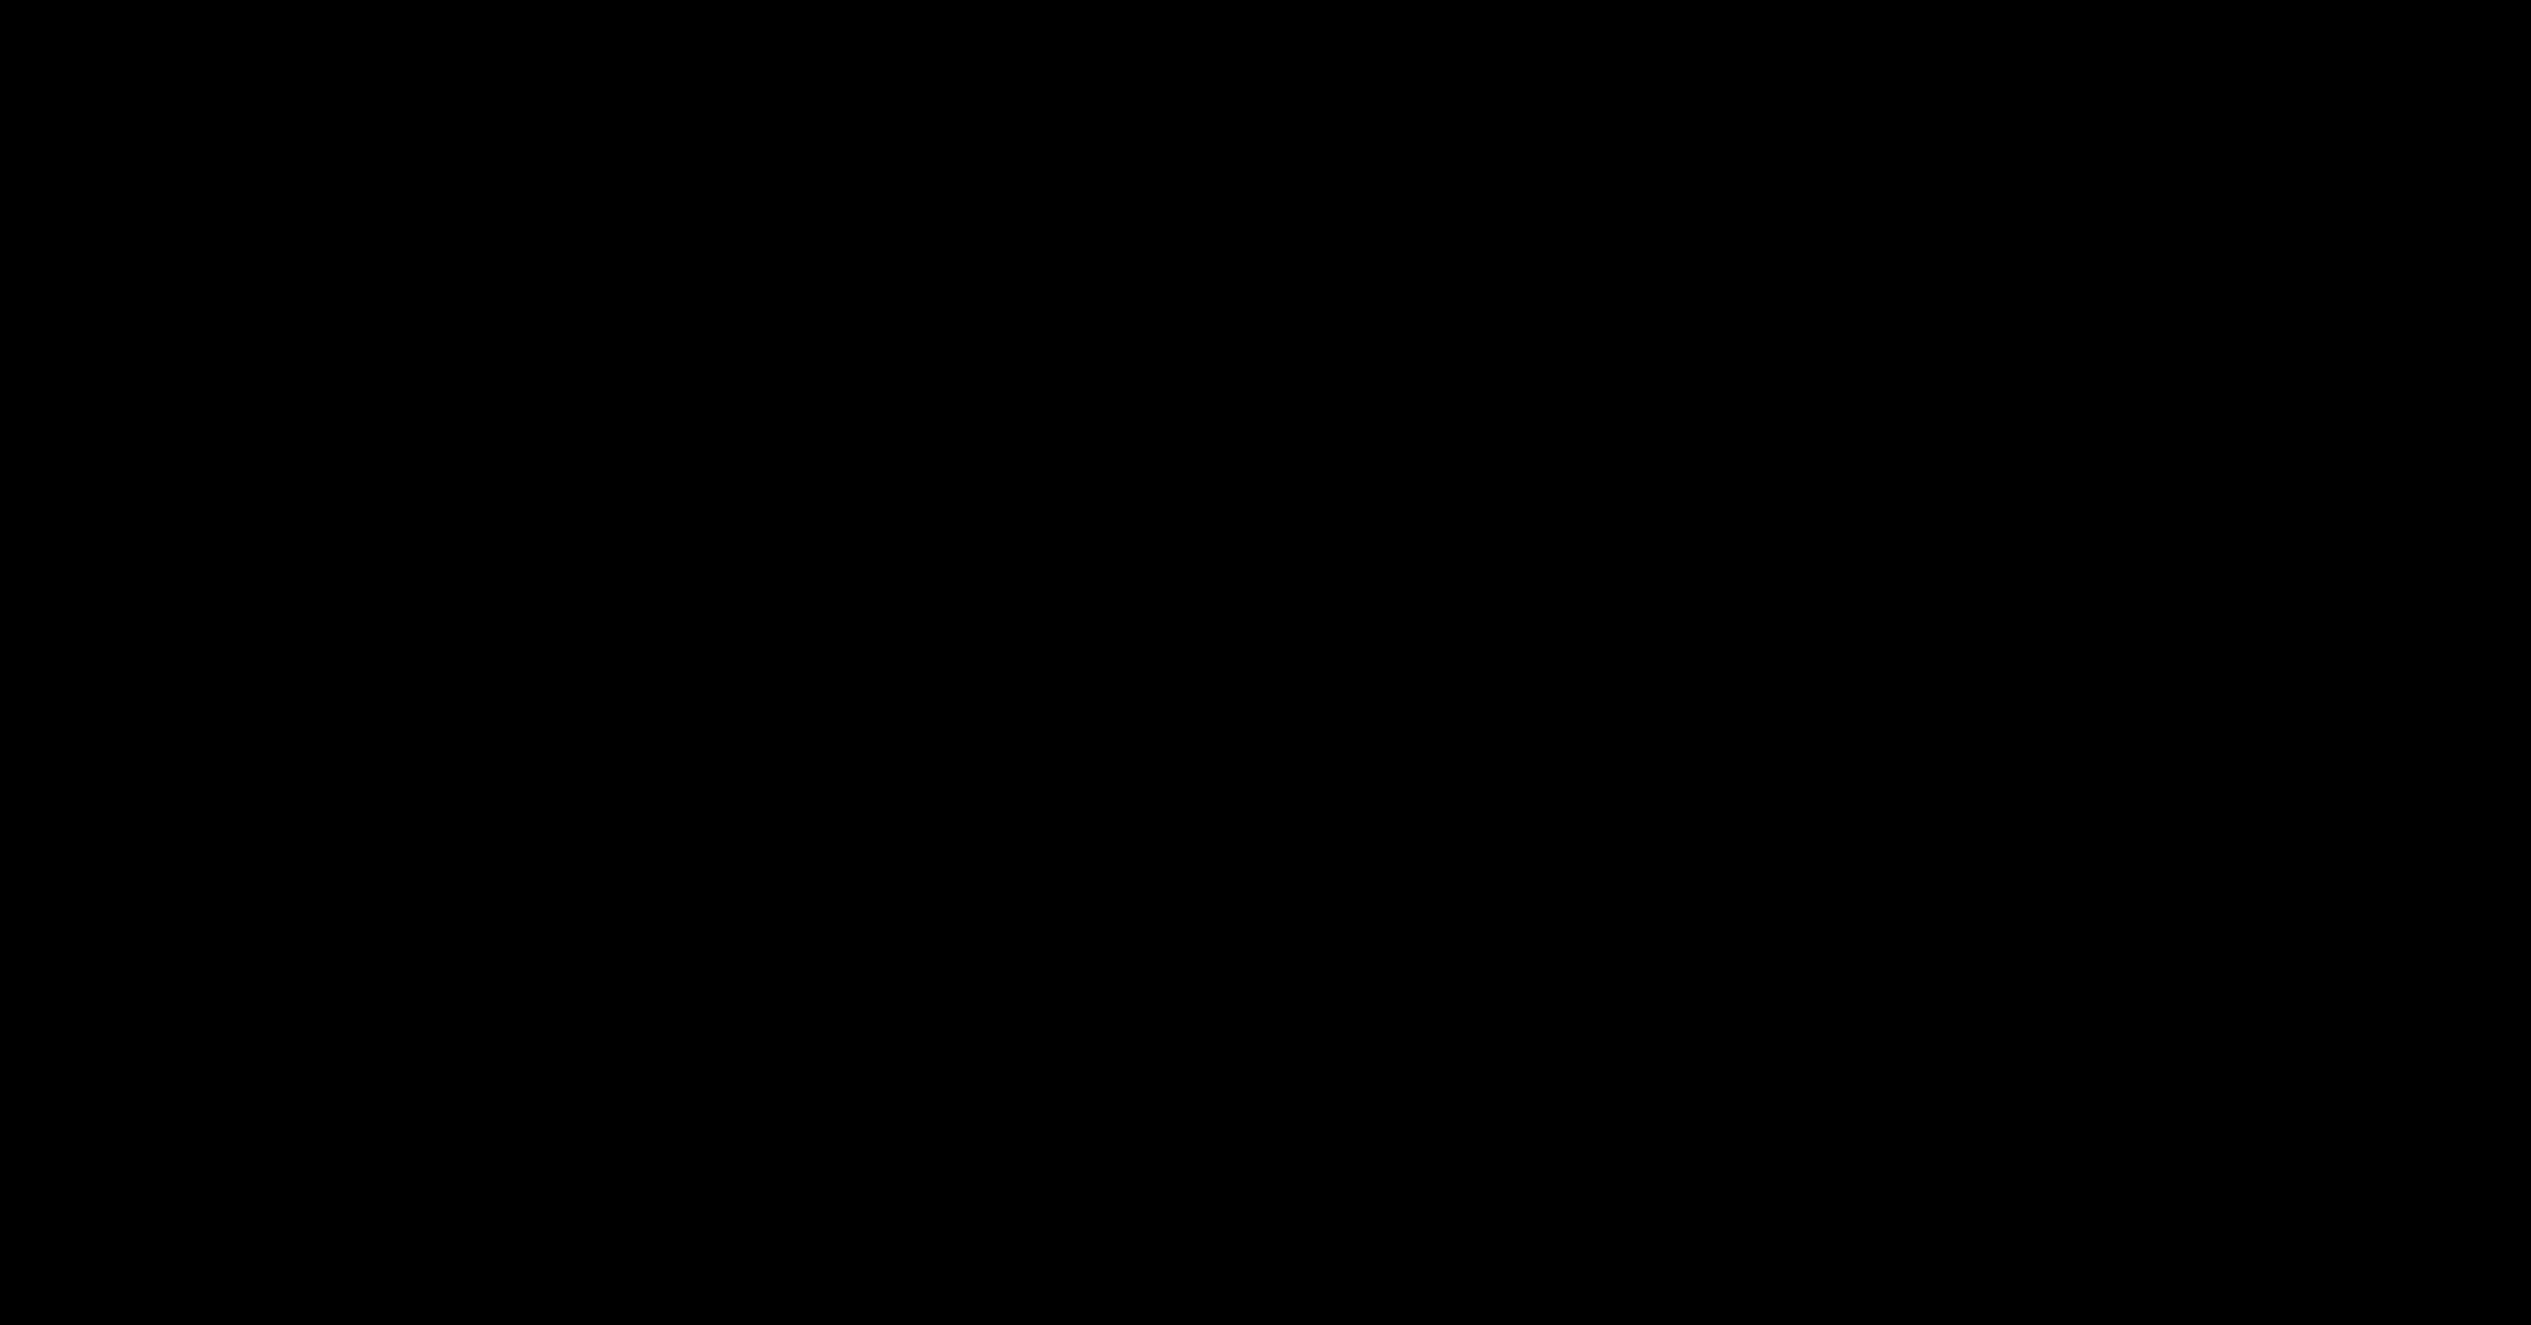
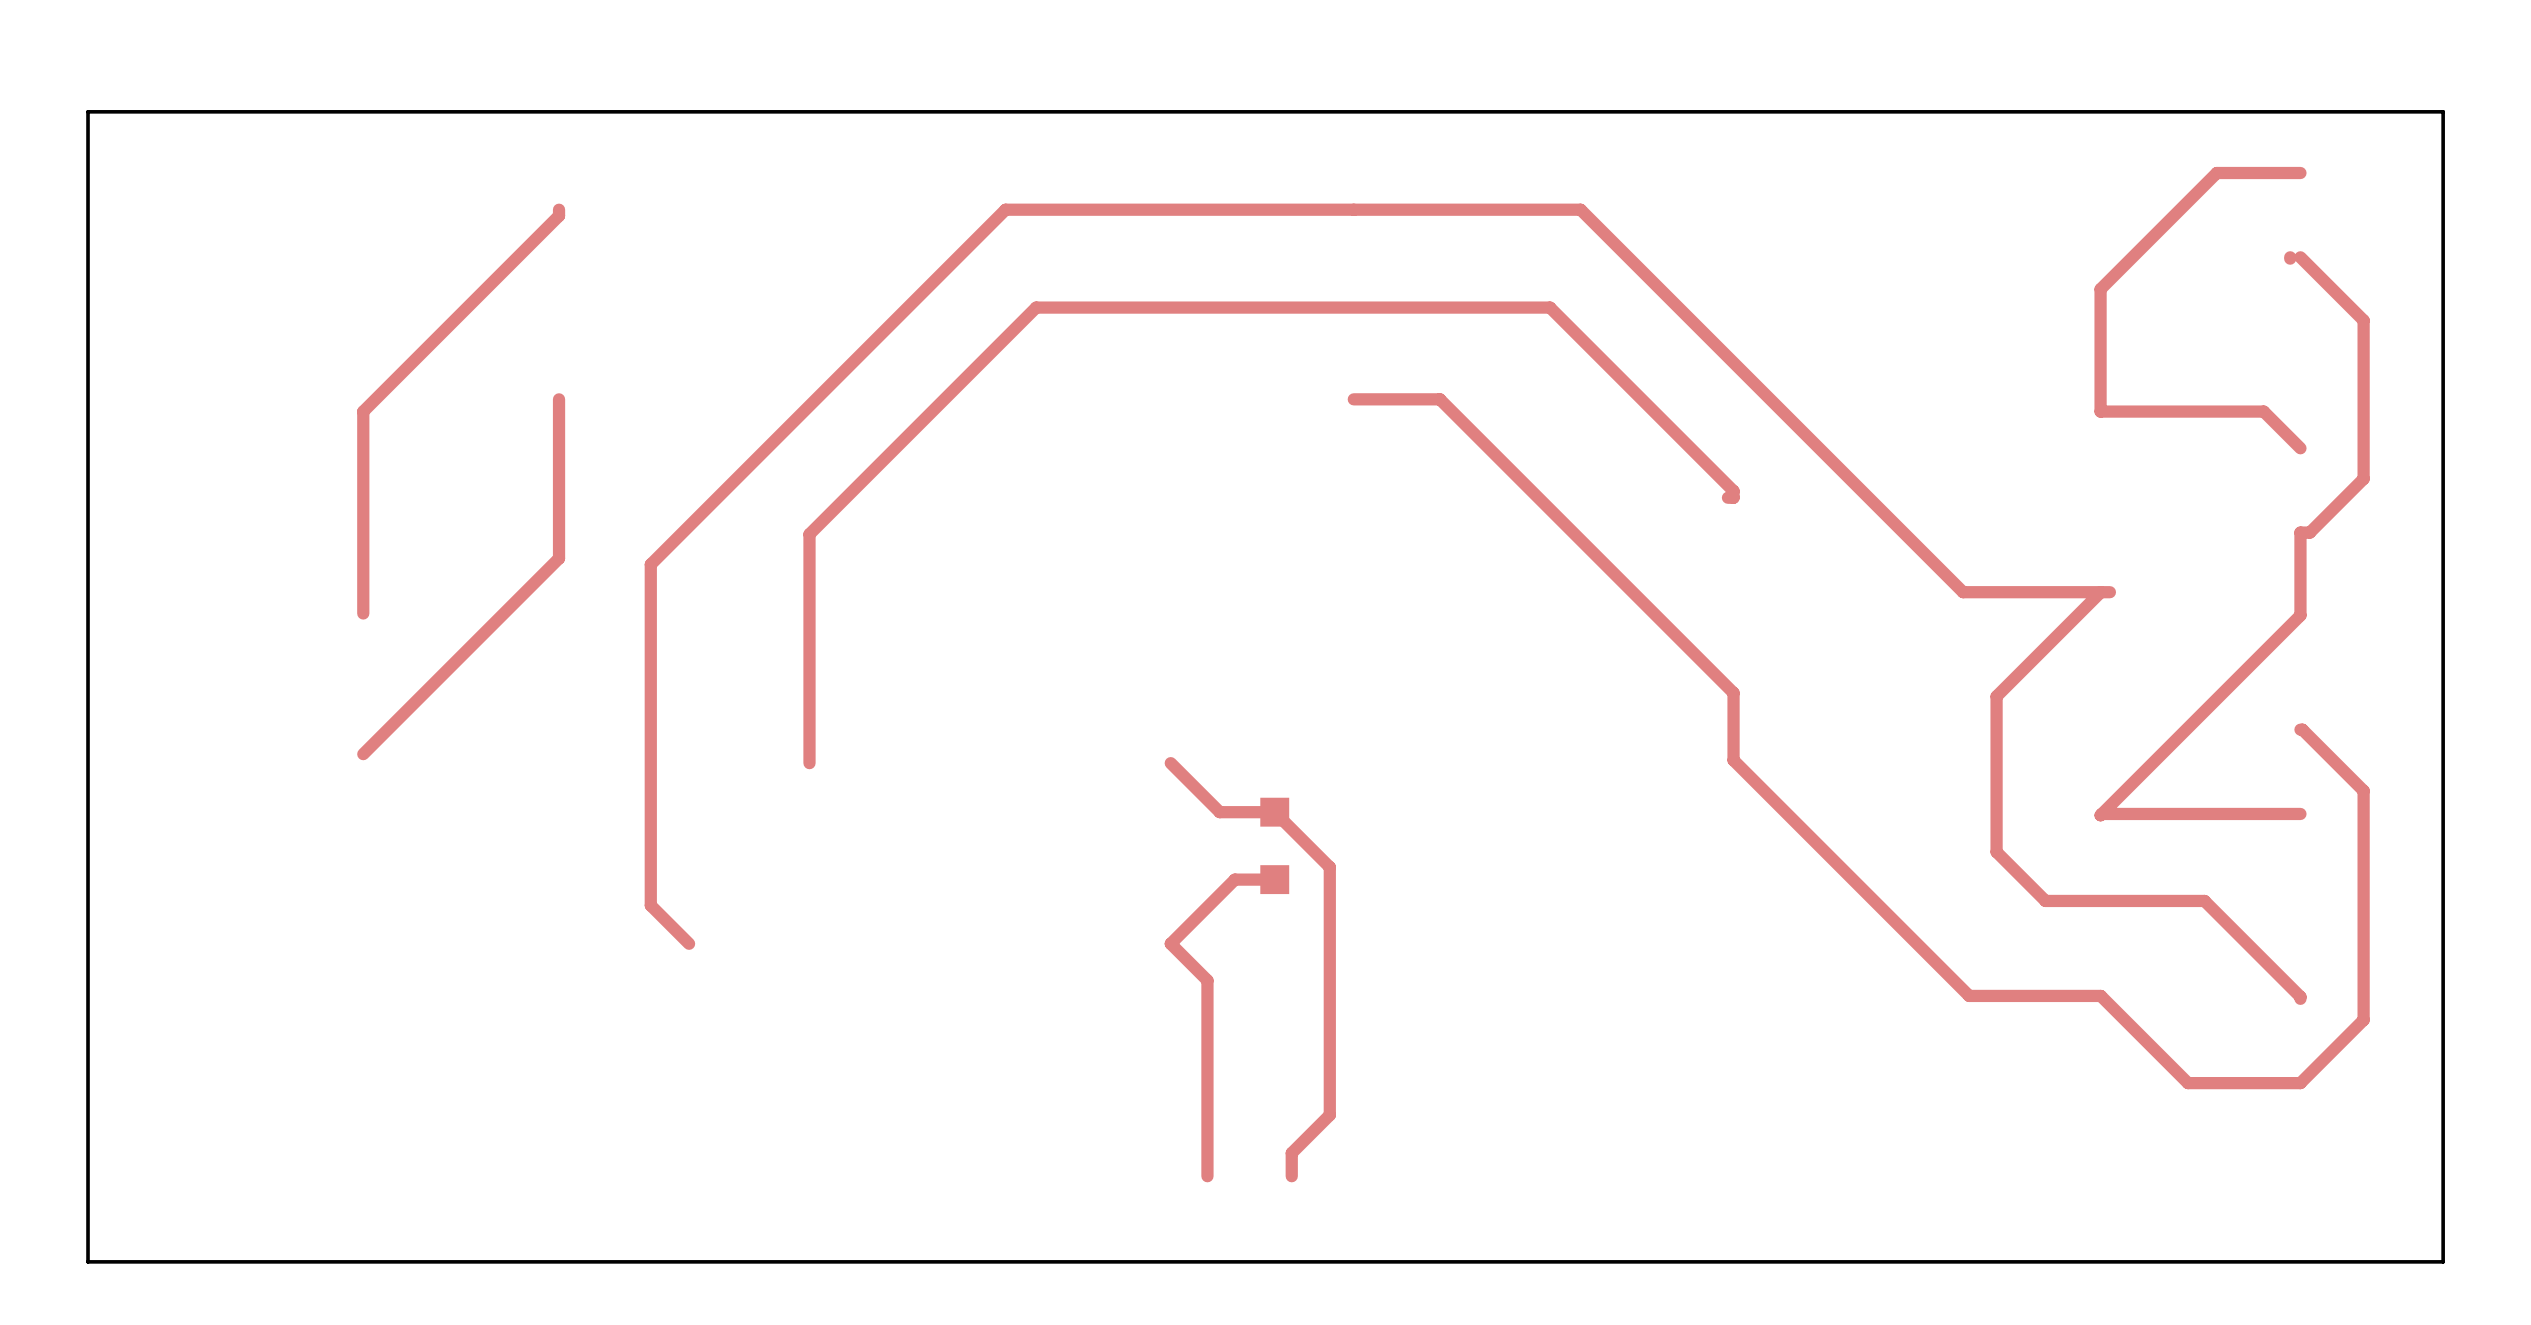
board edge: none -> (2443, 111) (88, 111) (88, 1261) (2443, 1261) (2443, 111)
top track: none -> (2300, 173) (2216, 173) (2100, 289) (2100, 411) (2263, 411) (2300, 448)
top track: none -> (559, 209) (559, 215) (363, 411) (363, 613)
top track: none -> (2290, 257) (2290, 258)
top track: none -> (2300, 257) (2363, 320) (2363, 478) (2309, 532) (2300, 532) (2300, 615) (2100, 815)
top track: none -> (559, 399) (559, 558) (363, 754)
top track: none -> (1353, 399) (1439, 399) (1733, 692) (1733, 760) (1969, 995) (2100, 995) (2187, 1083) (2300, 1083) (2363, 1019) (2363, 790) (2300, 729)
top track: none -> (1727, 497) (1733, 497) (1733, 491) (1550, 307) (1036, 307) (809, 534) (809, 763)
top track: none -> (2100, 592) (1996, 696) (1996, 852) (2045, 900) (2204, 900) (2300, 998)
top track: none -> (2109, 592) (1963, 592) (1580, 209) (1005, 209) (650, 564) (650, 905) (689, 943)
top track: none -> (1170, 763) (1219, 812) (1274, 812) (1329, 867) (1329, 1115) (1291, 1153) (1291, 1176)
top track: none -> (2300, 813) (2101, 813)
part: none -> (1274, 845)
top track: none -> (1274, 879) (1234, 879) (1170, 943) (1207, 980) (1207, 1176)

